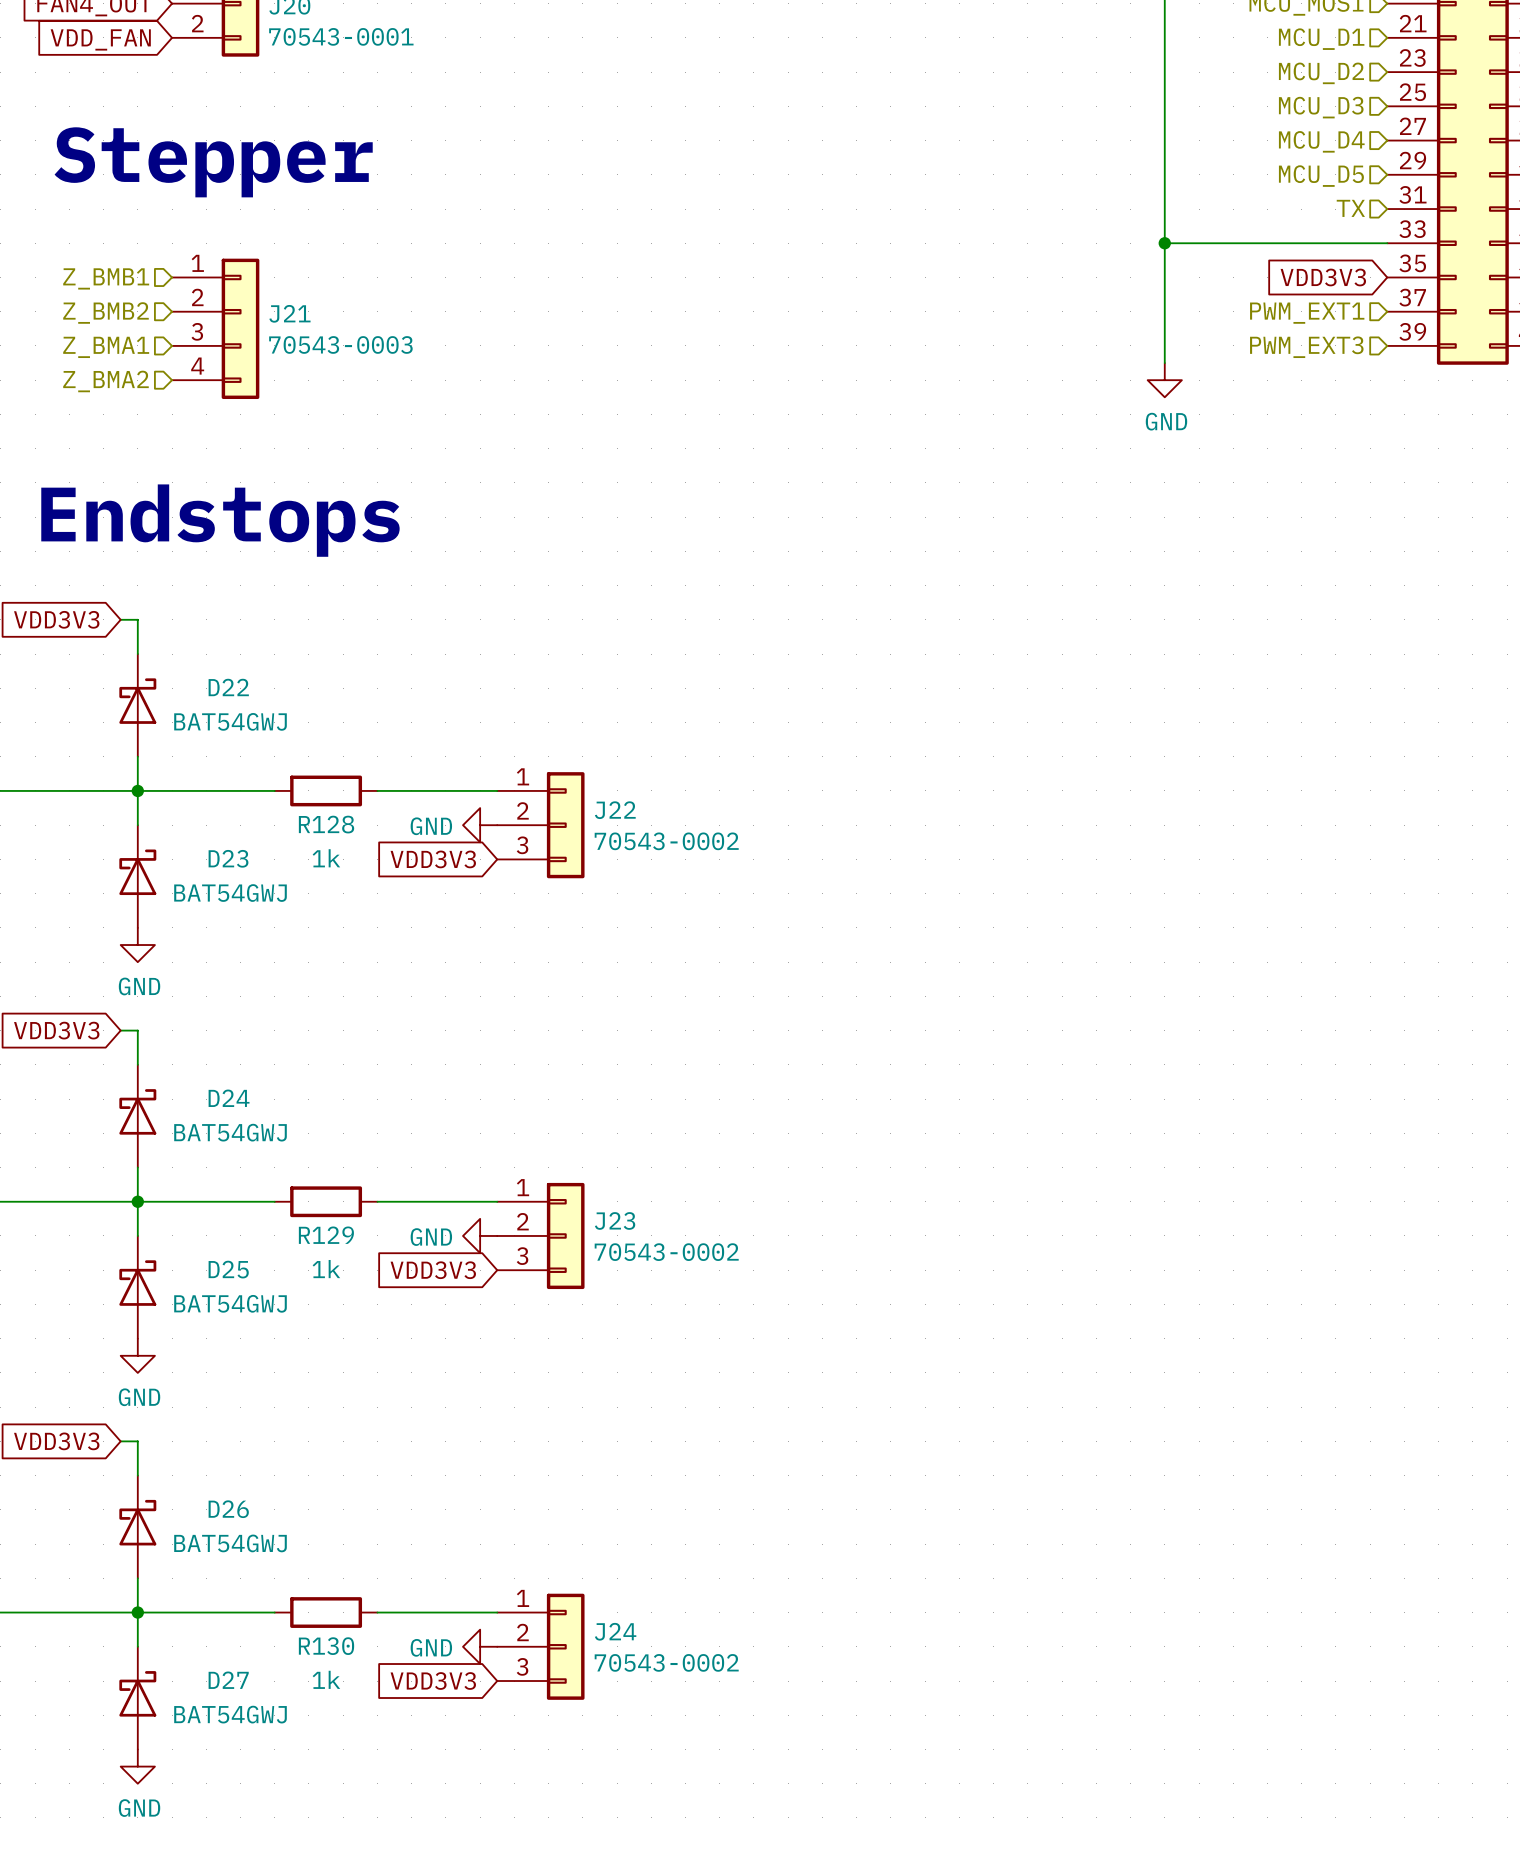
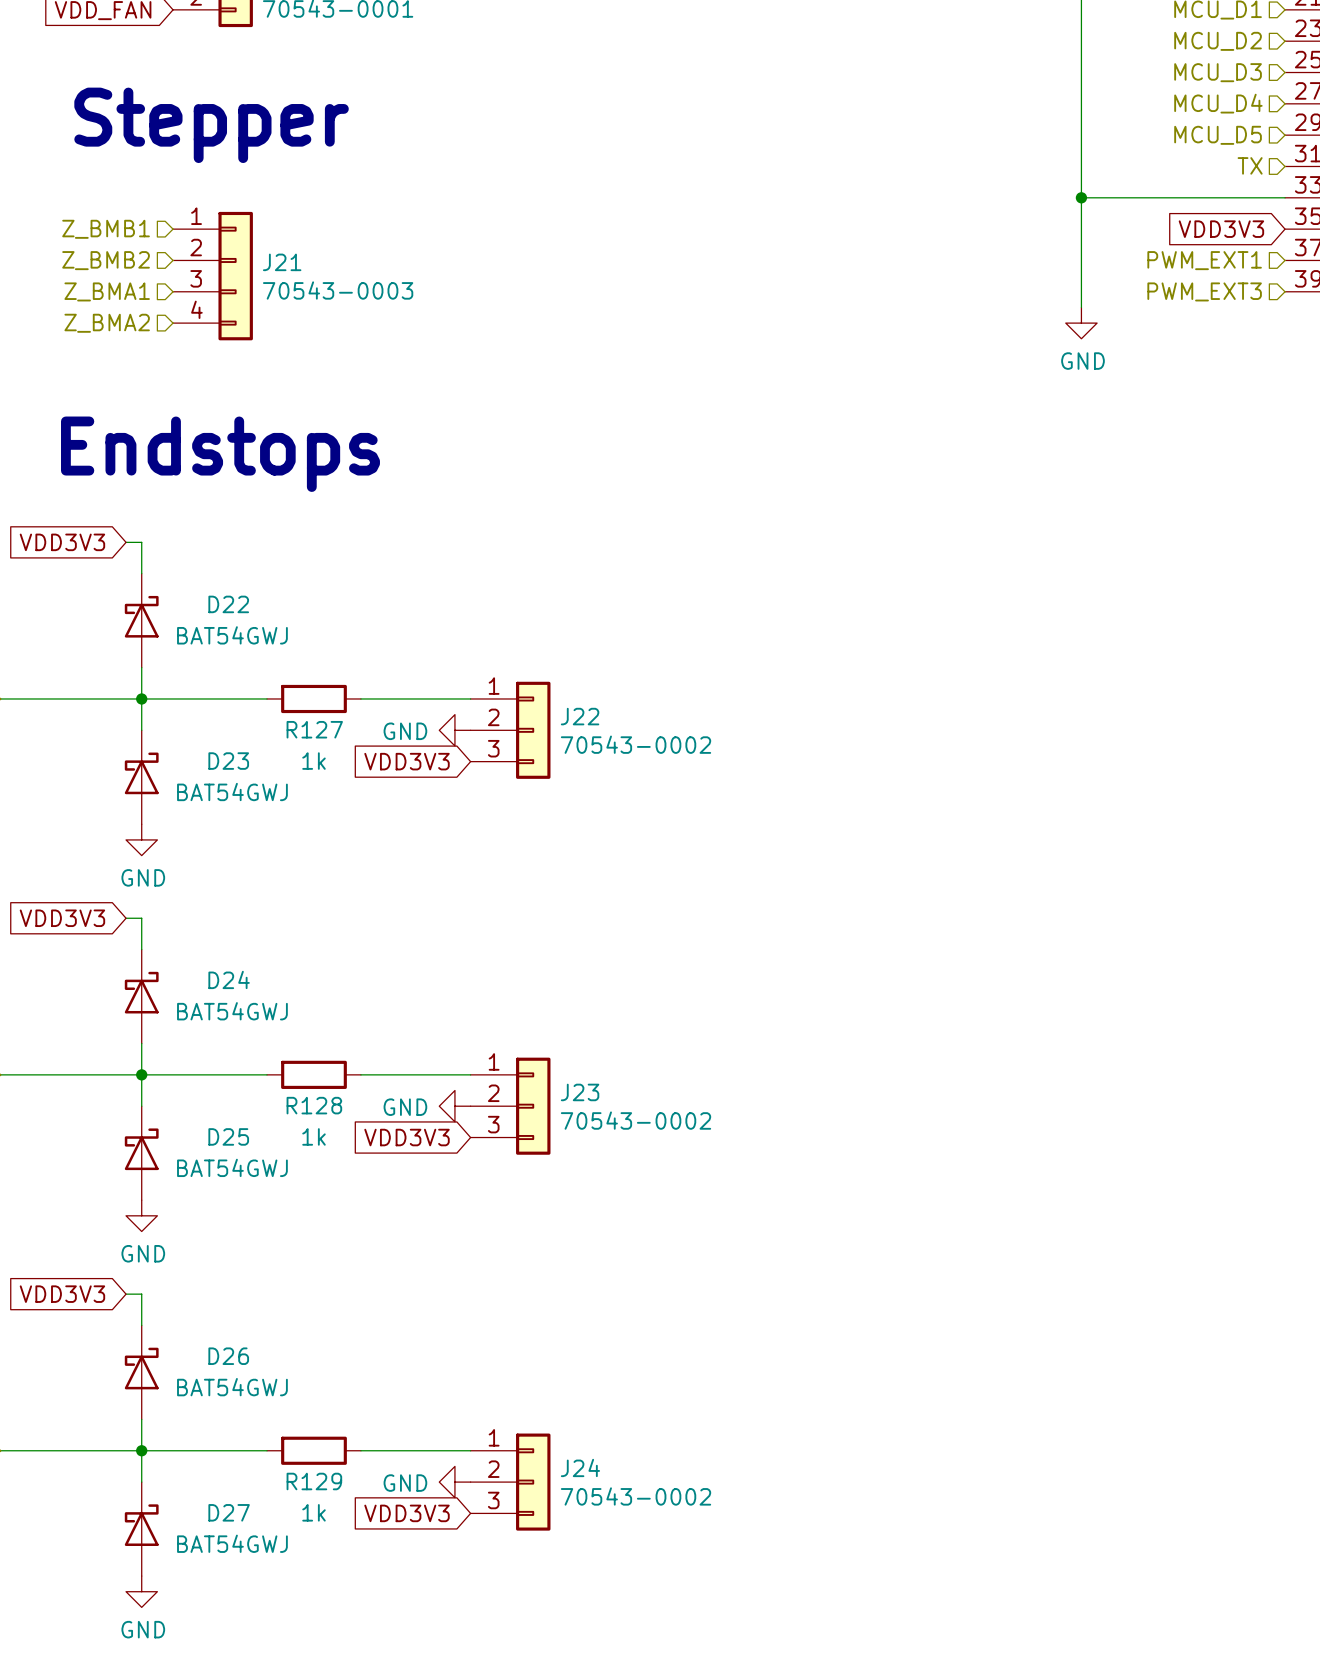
R128 name: R128 (326, 824) -> R127 (314, 729)
R129 name: R129 (326, 1235) -> R128 (314, 1105)
R130 name: R130 (326, 1646) -> R129 (314, 1481)

